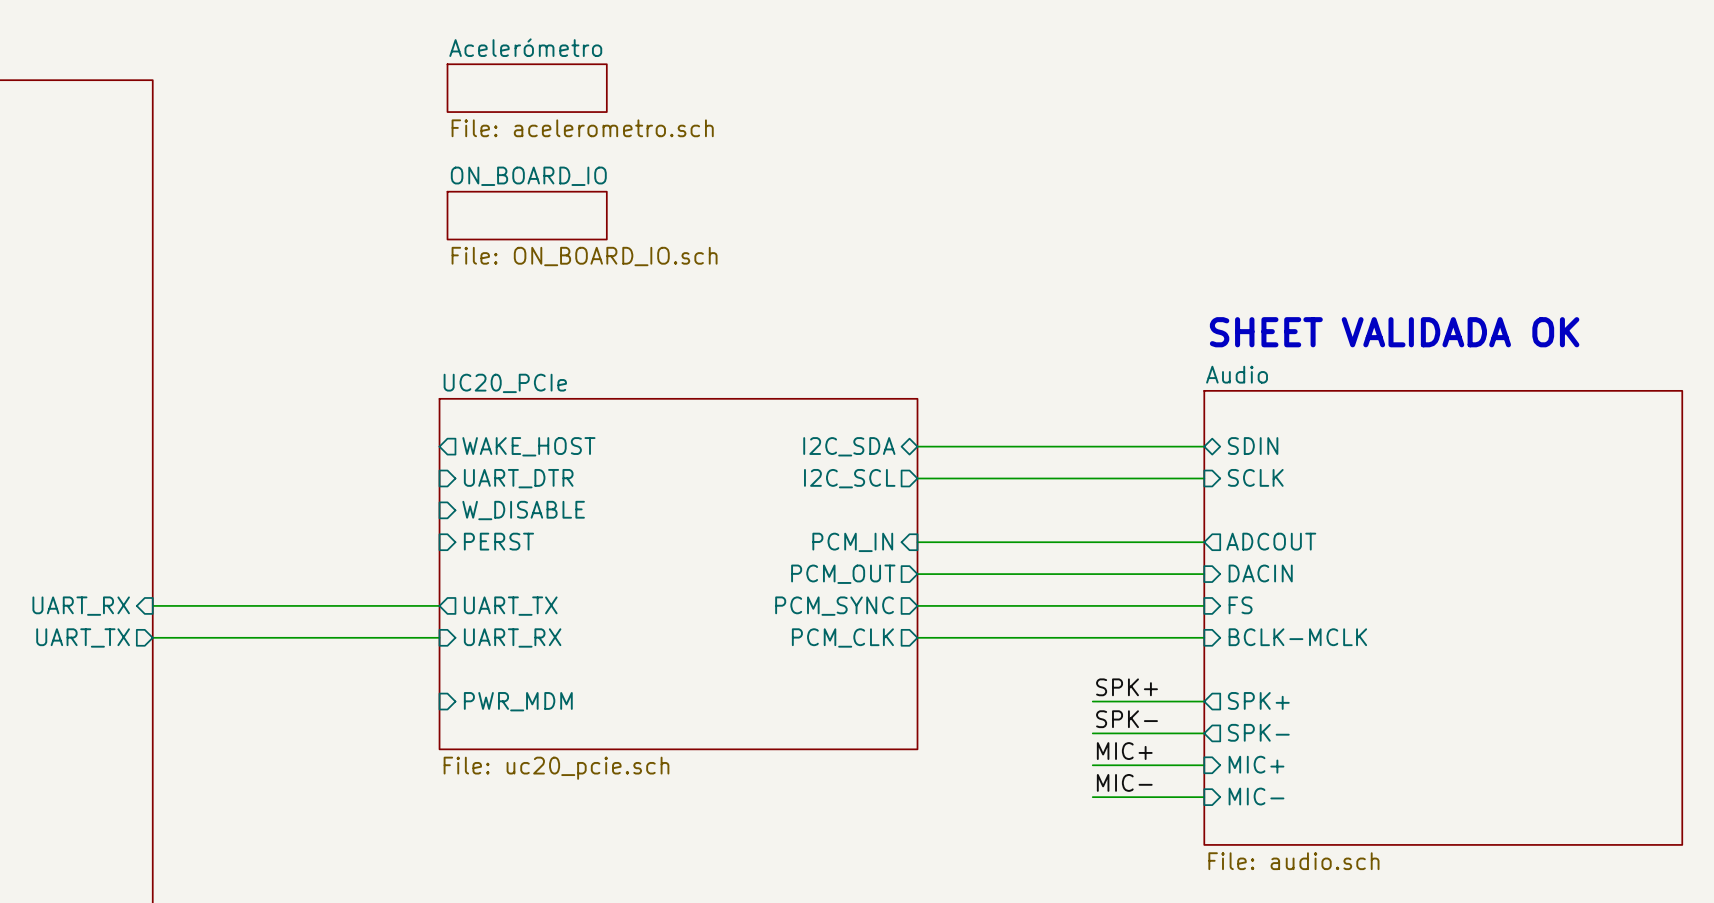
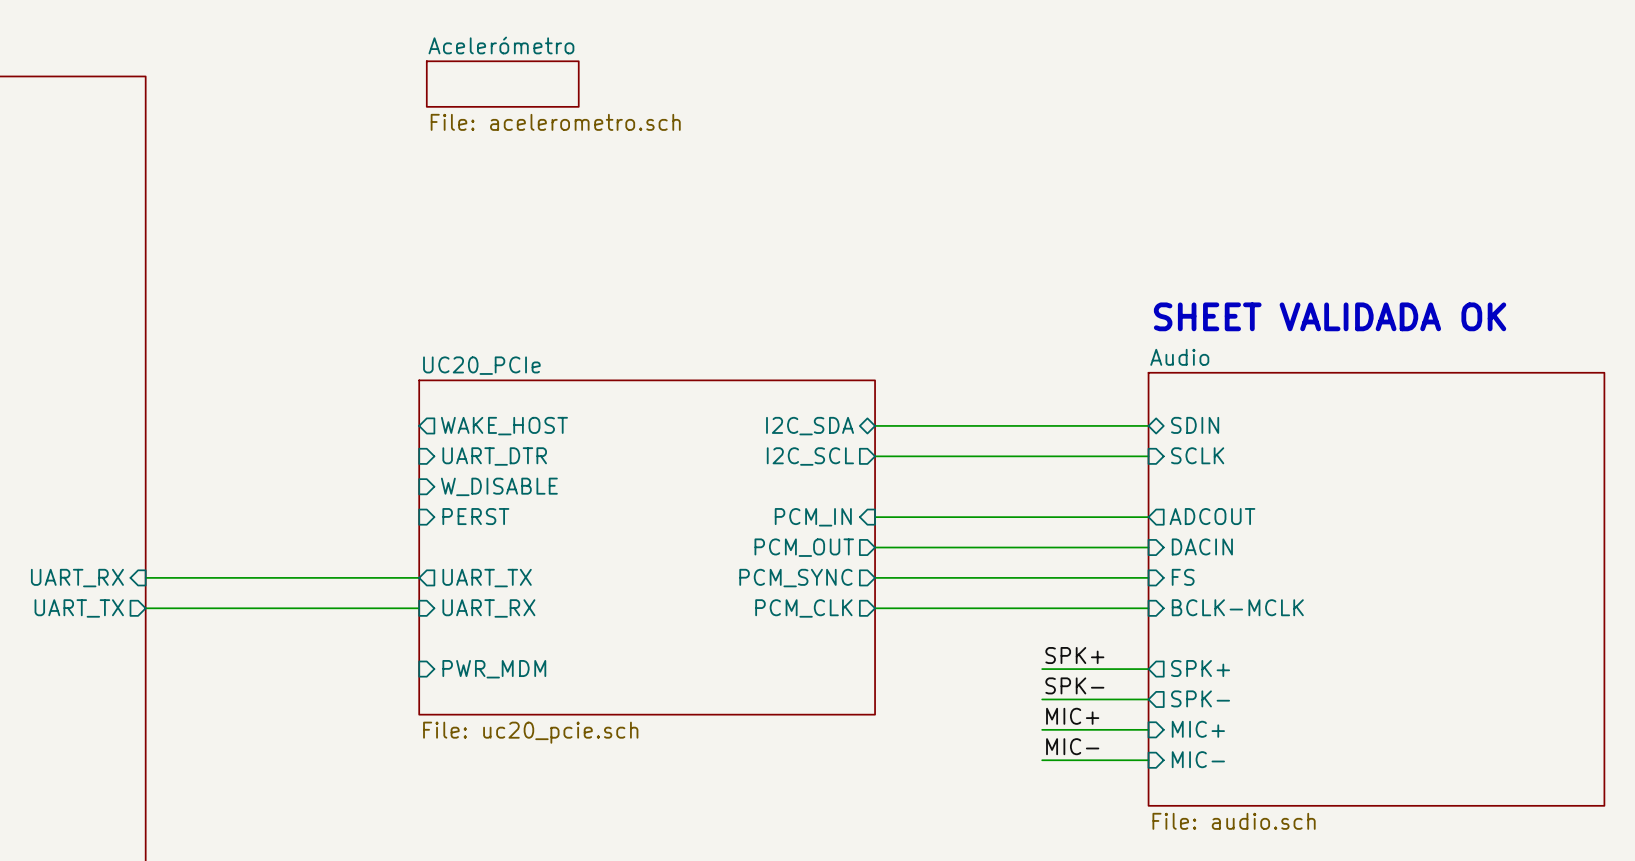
sheet ON_BOARD_IO: File: ON_BOARD_IO.sch (527, 215) -> none

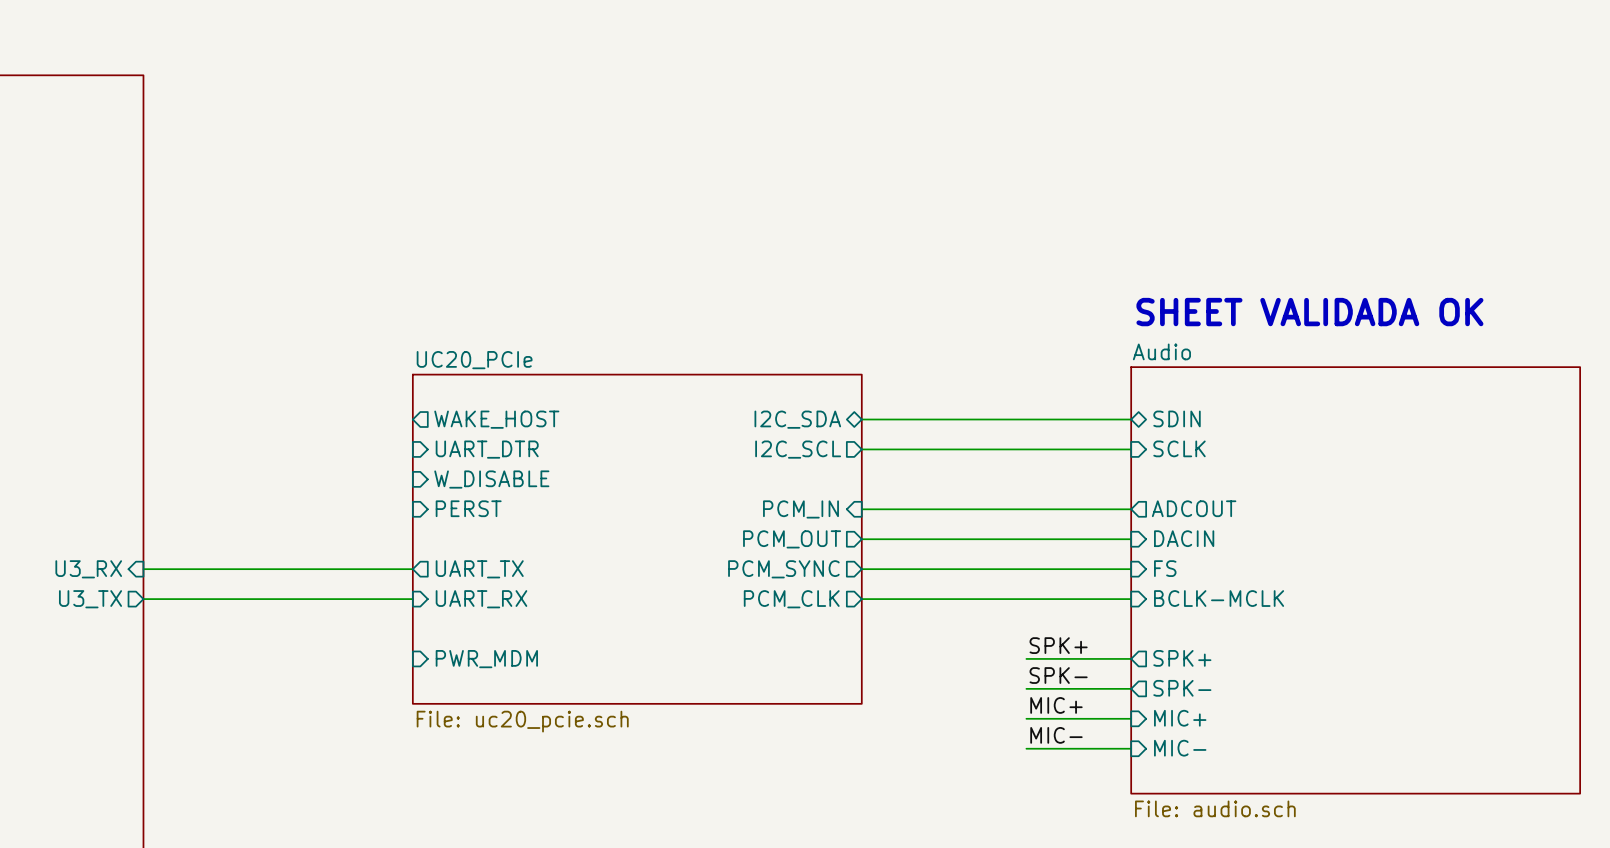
sheet Acelerómetro: File: acelerometro.sch (502, 84) -> none
sheet pin: UART_RX (77, 578) -> U3_RX (88, 569)
sheet pin: UART_TX (79, 608) -> U3_TX (90, 599)

